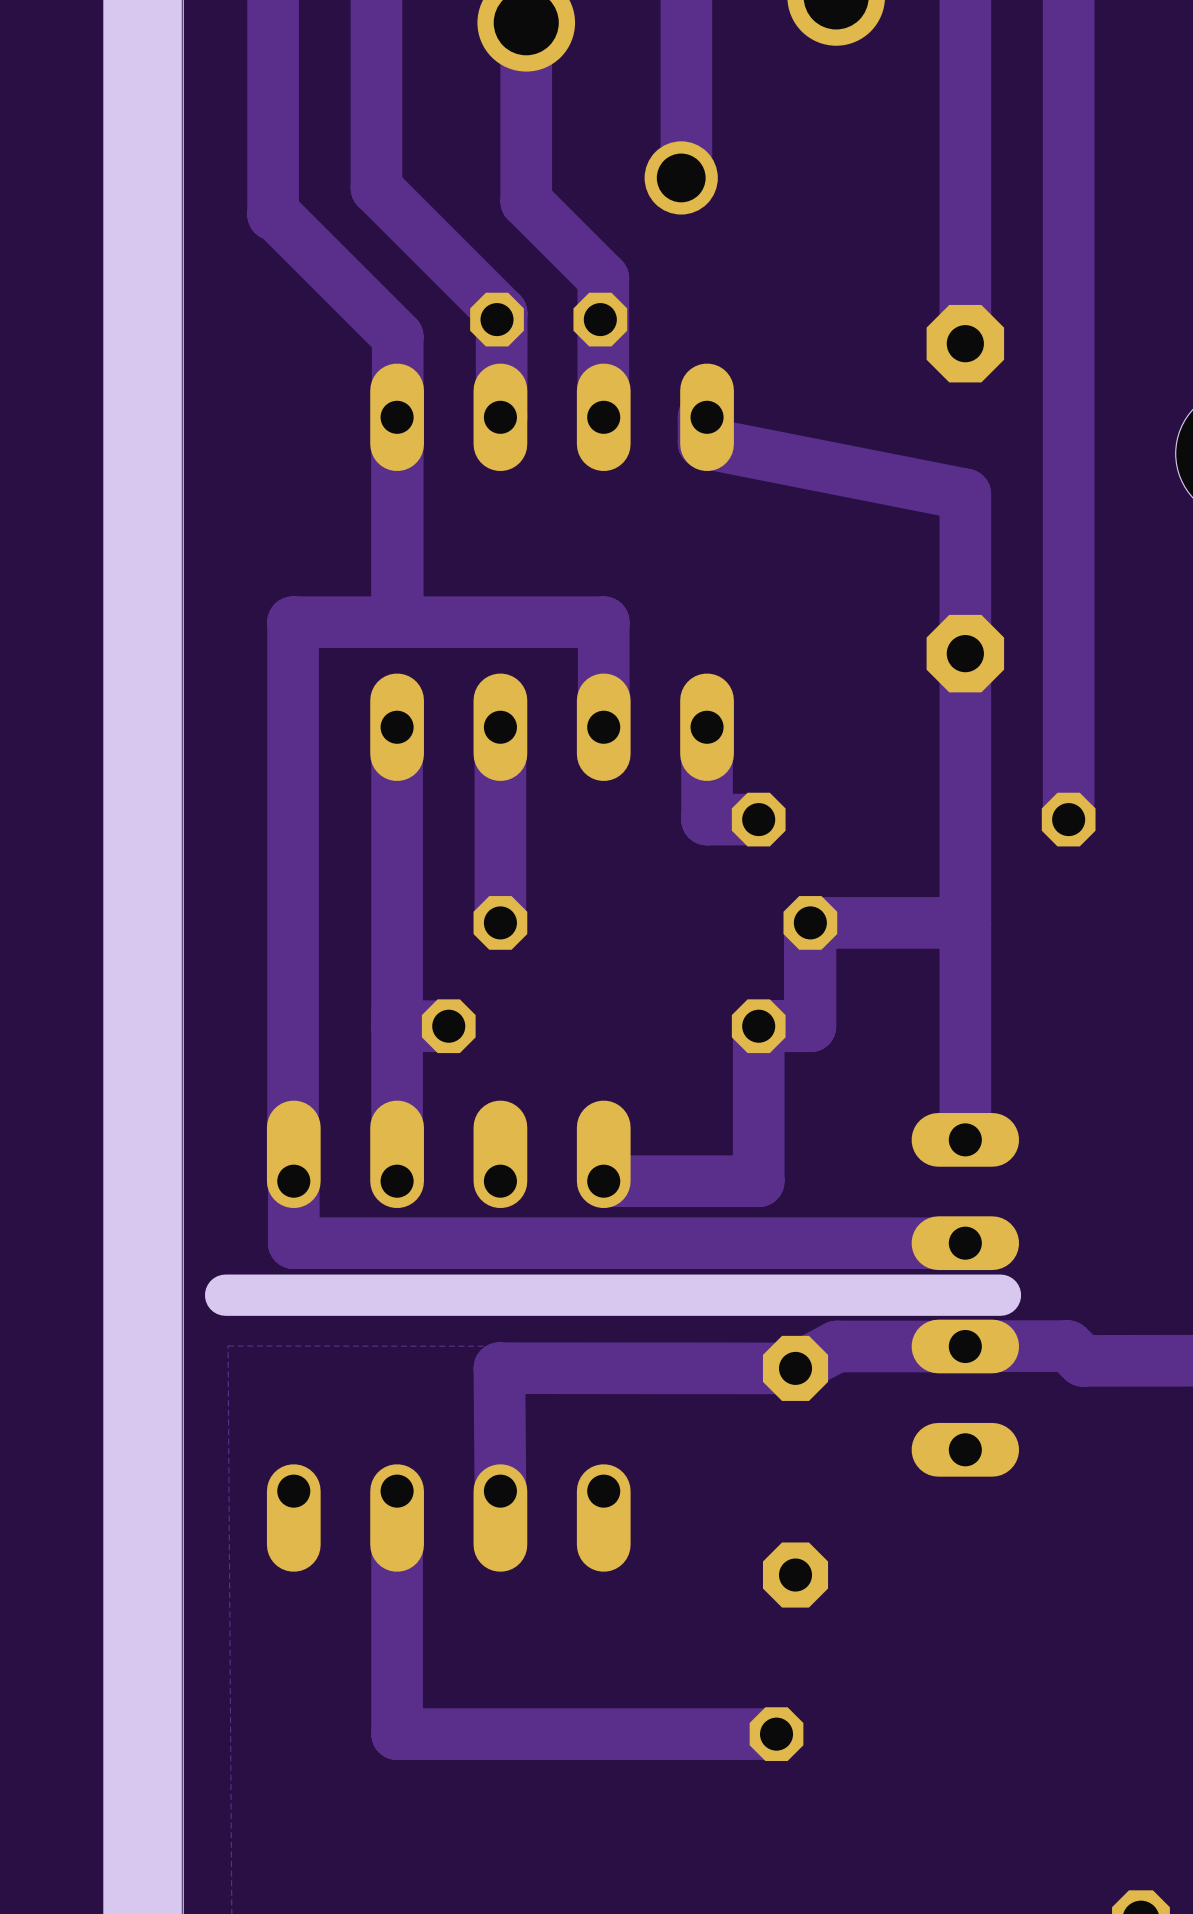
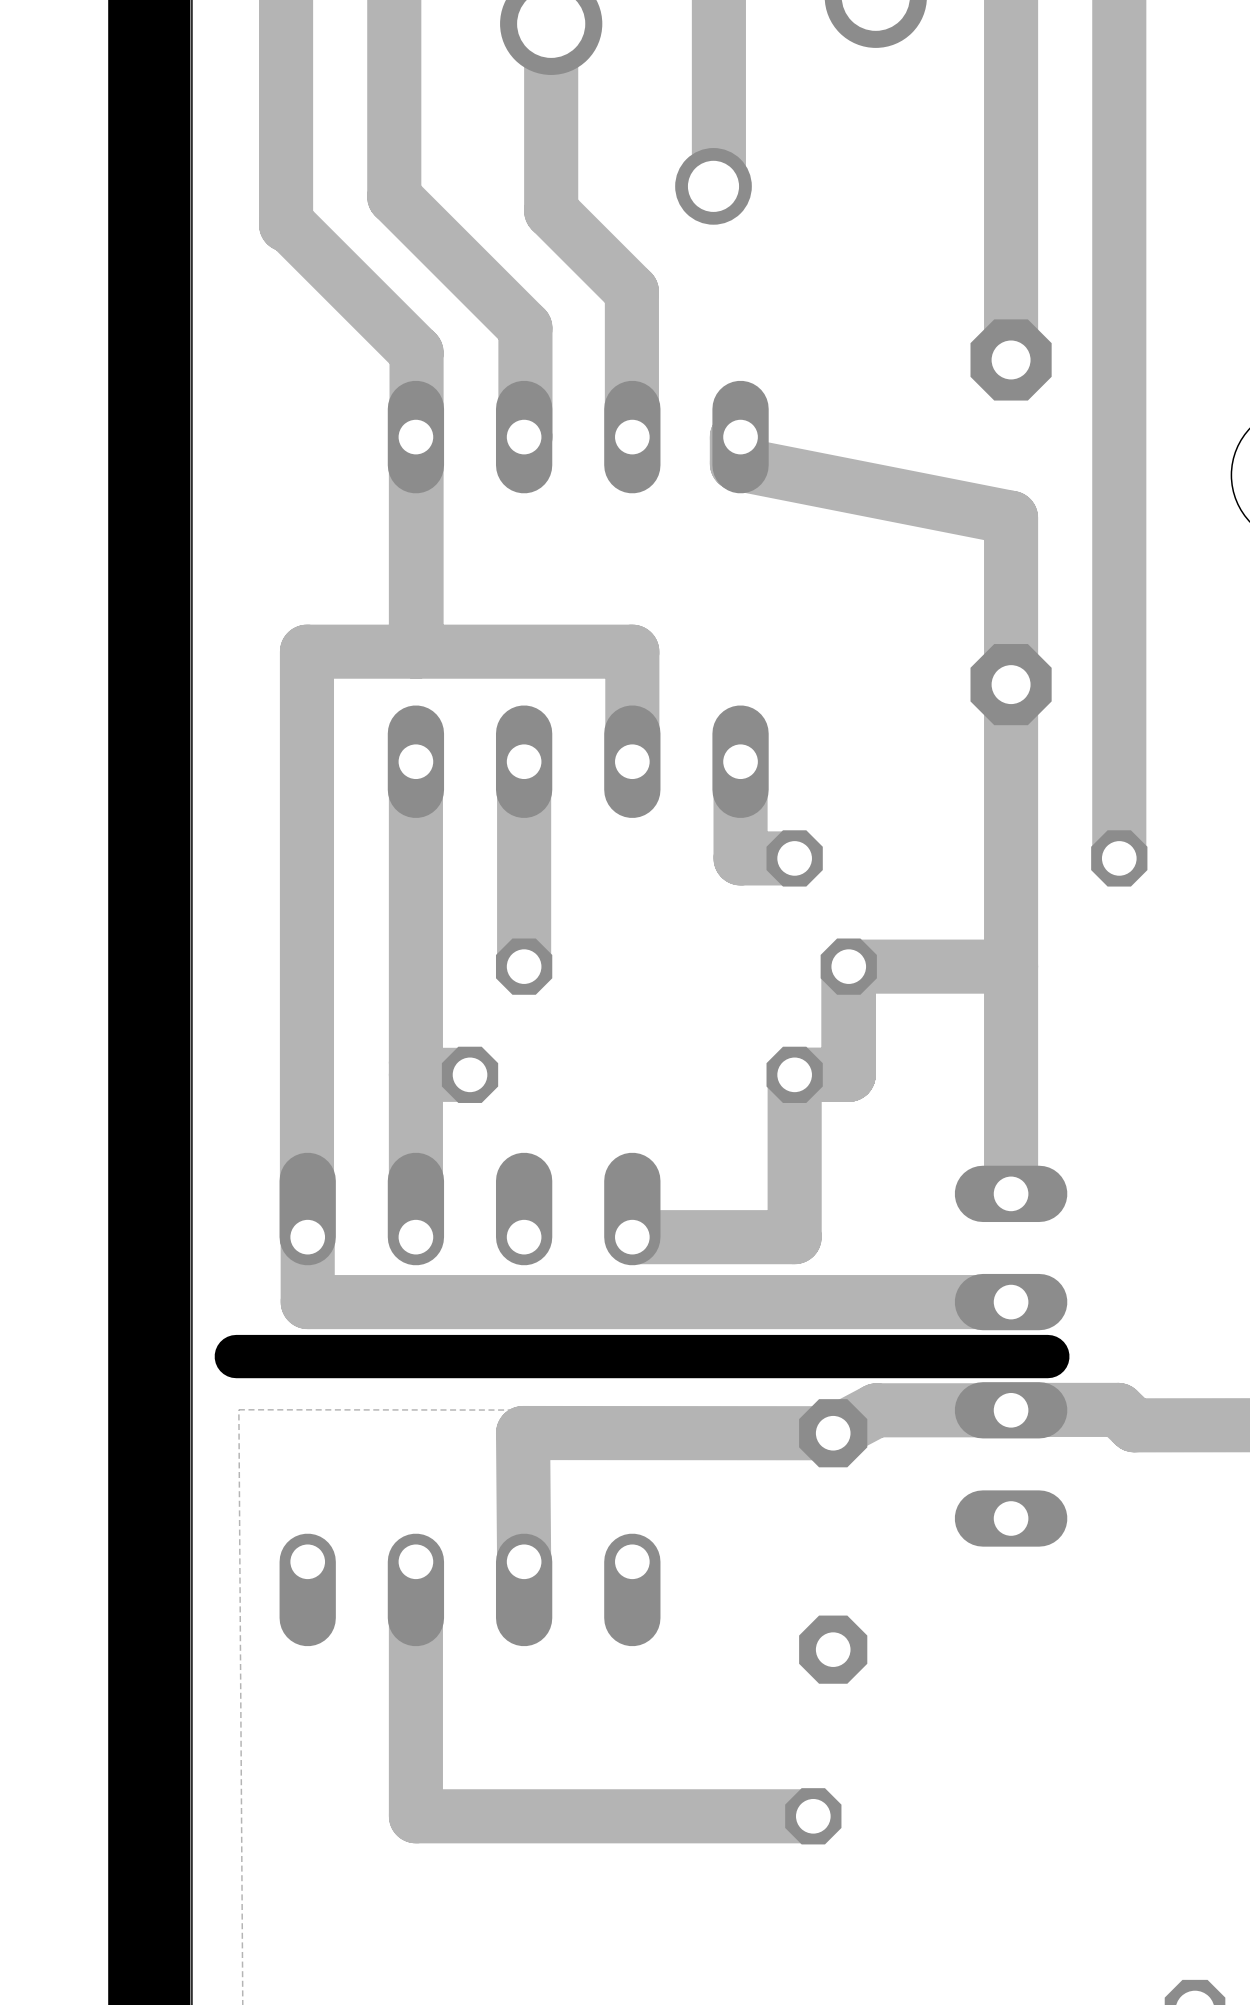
part: (548, 319) -> none

